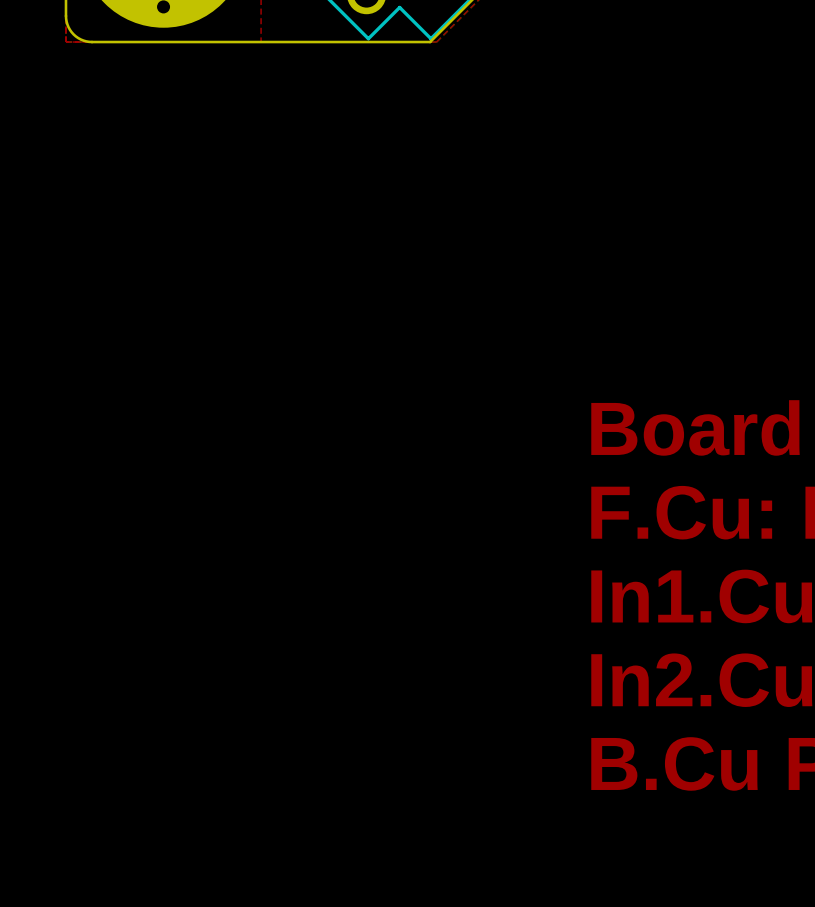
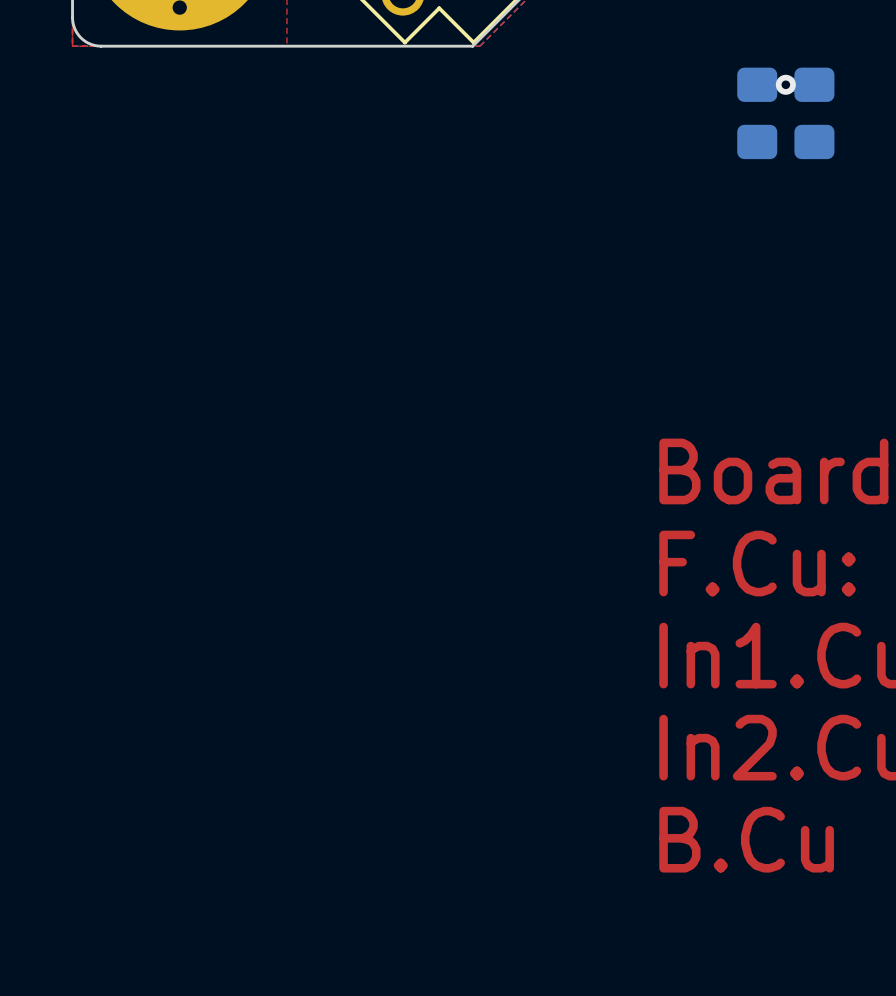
via: none -> (785, 84)
part: none -> (757, 113)
part: none -> (814, 113)

